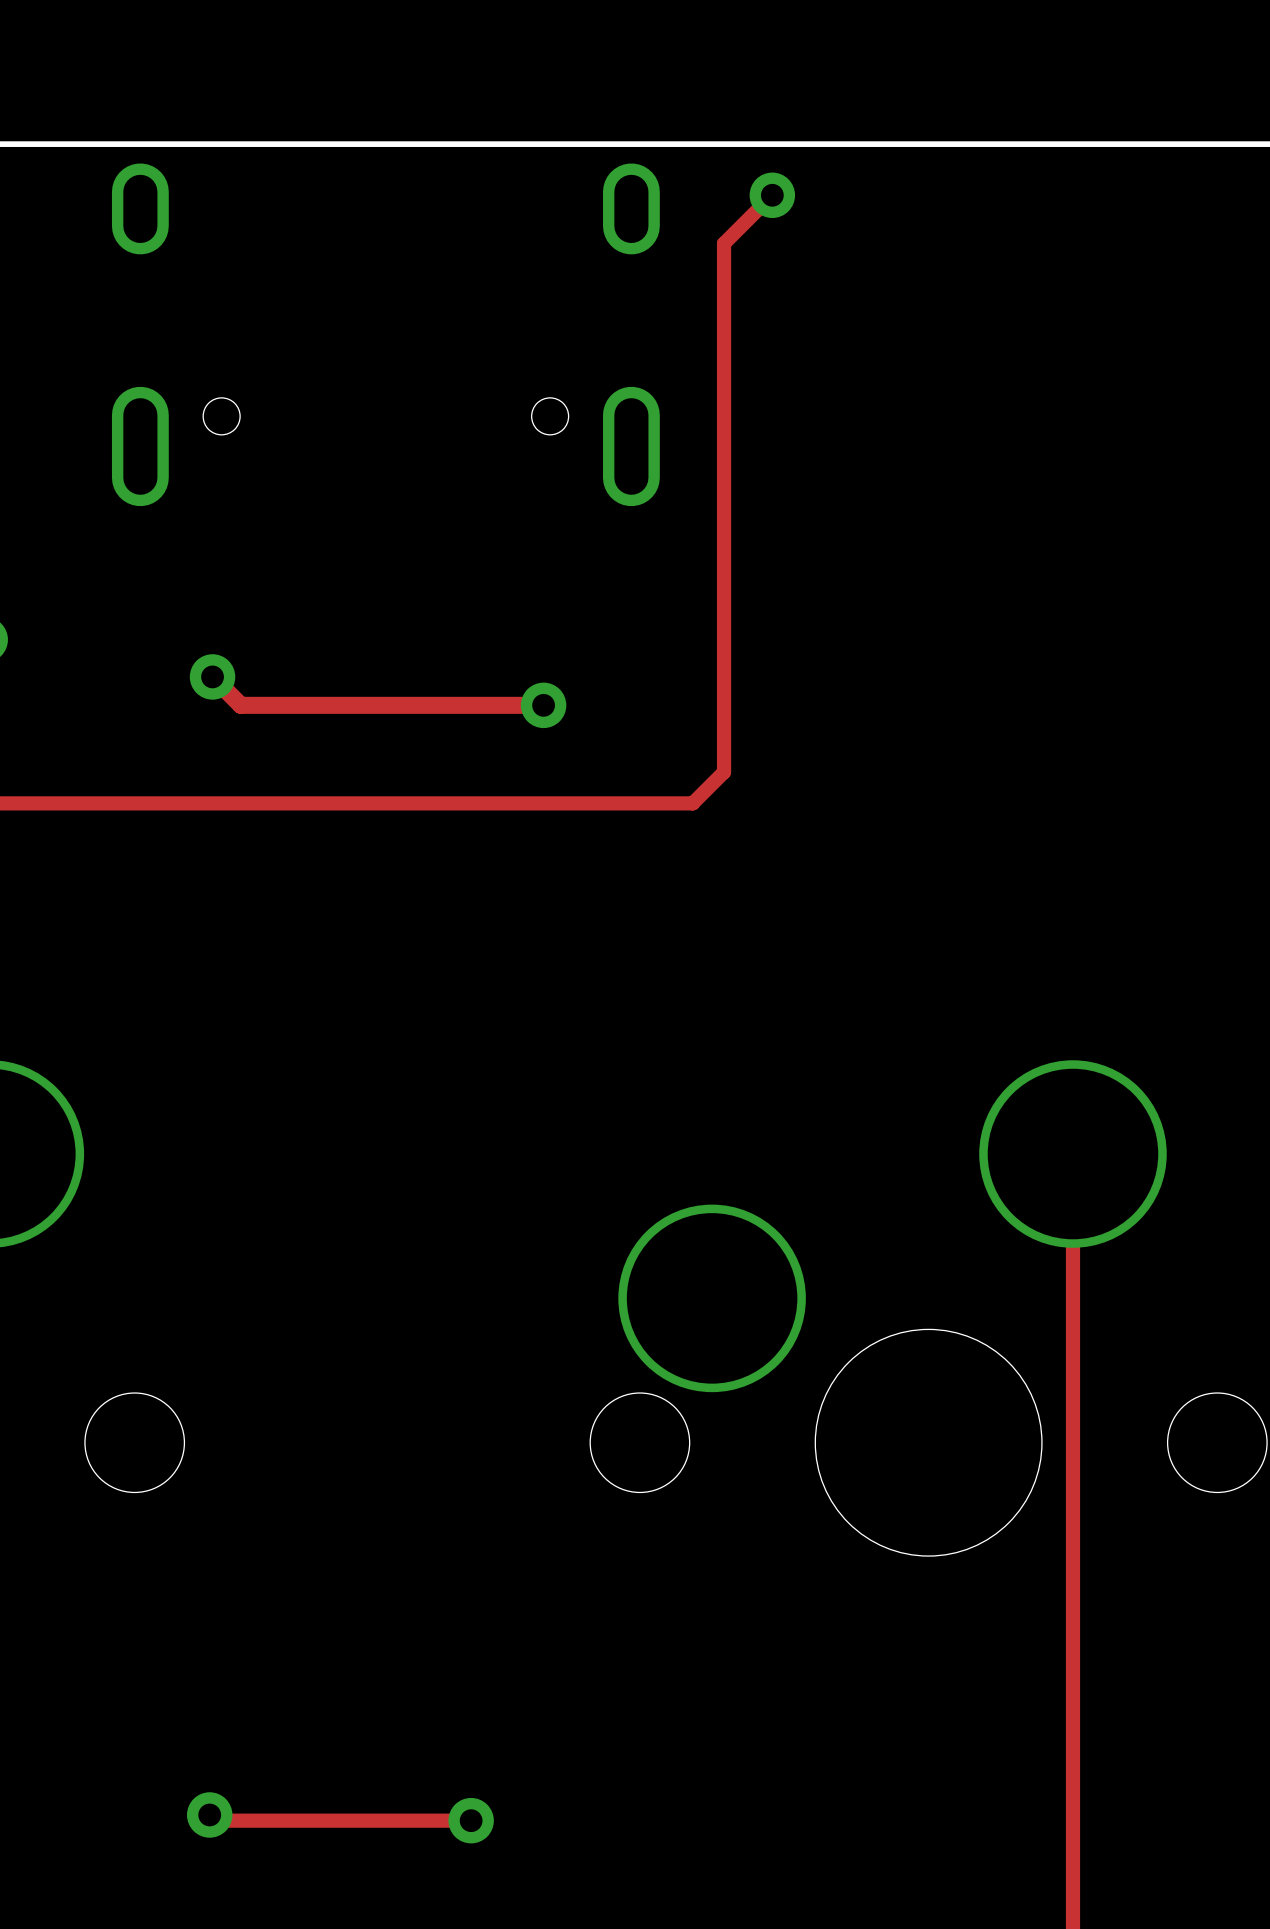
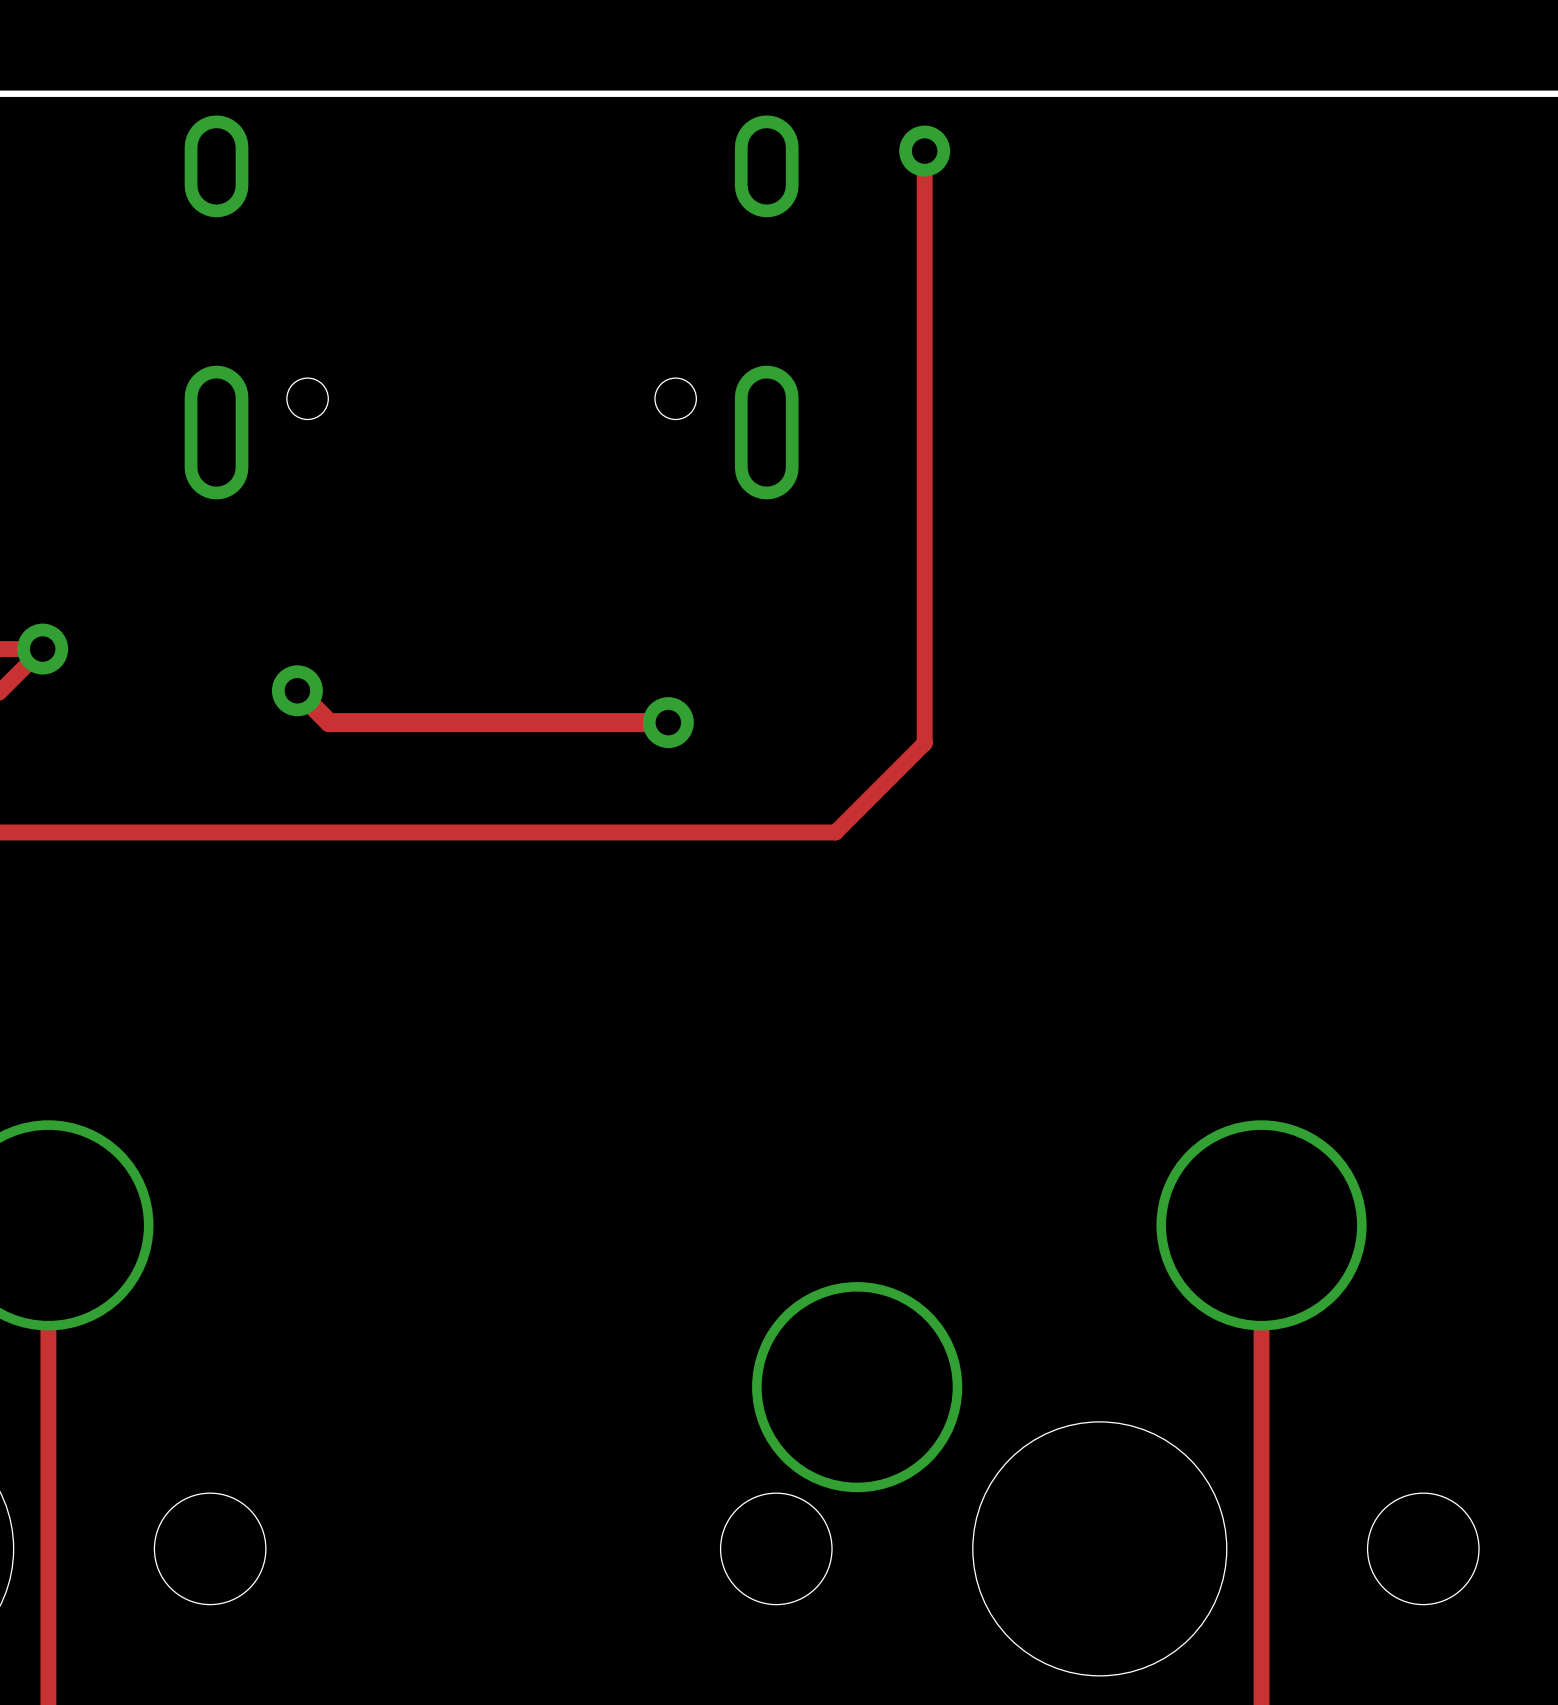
track: (772, 195) (724, 243) (724, 772) -> (924, 151) (924, 743) (870, 797)

